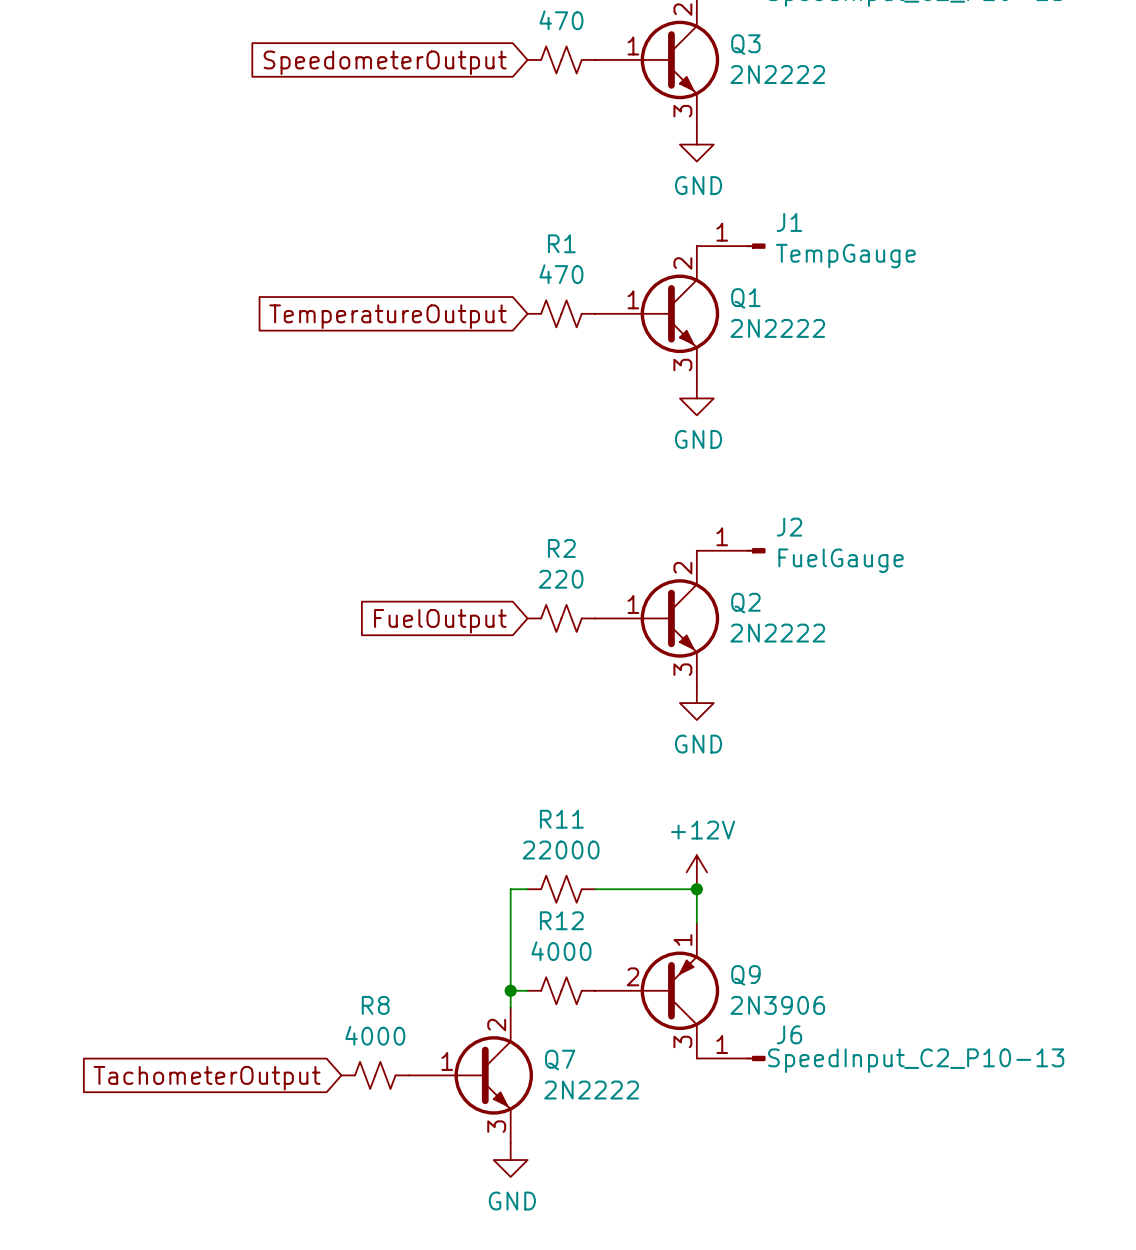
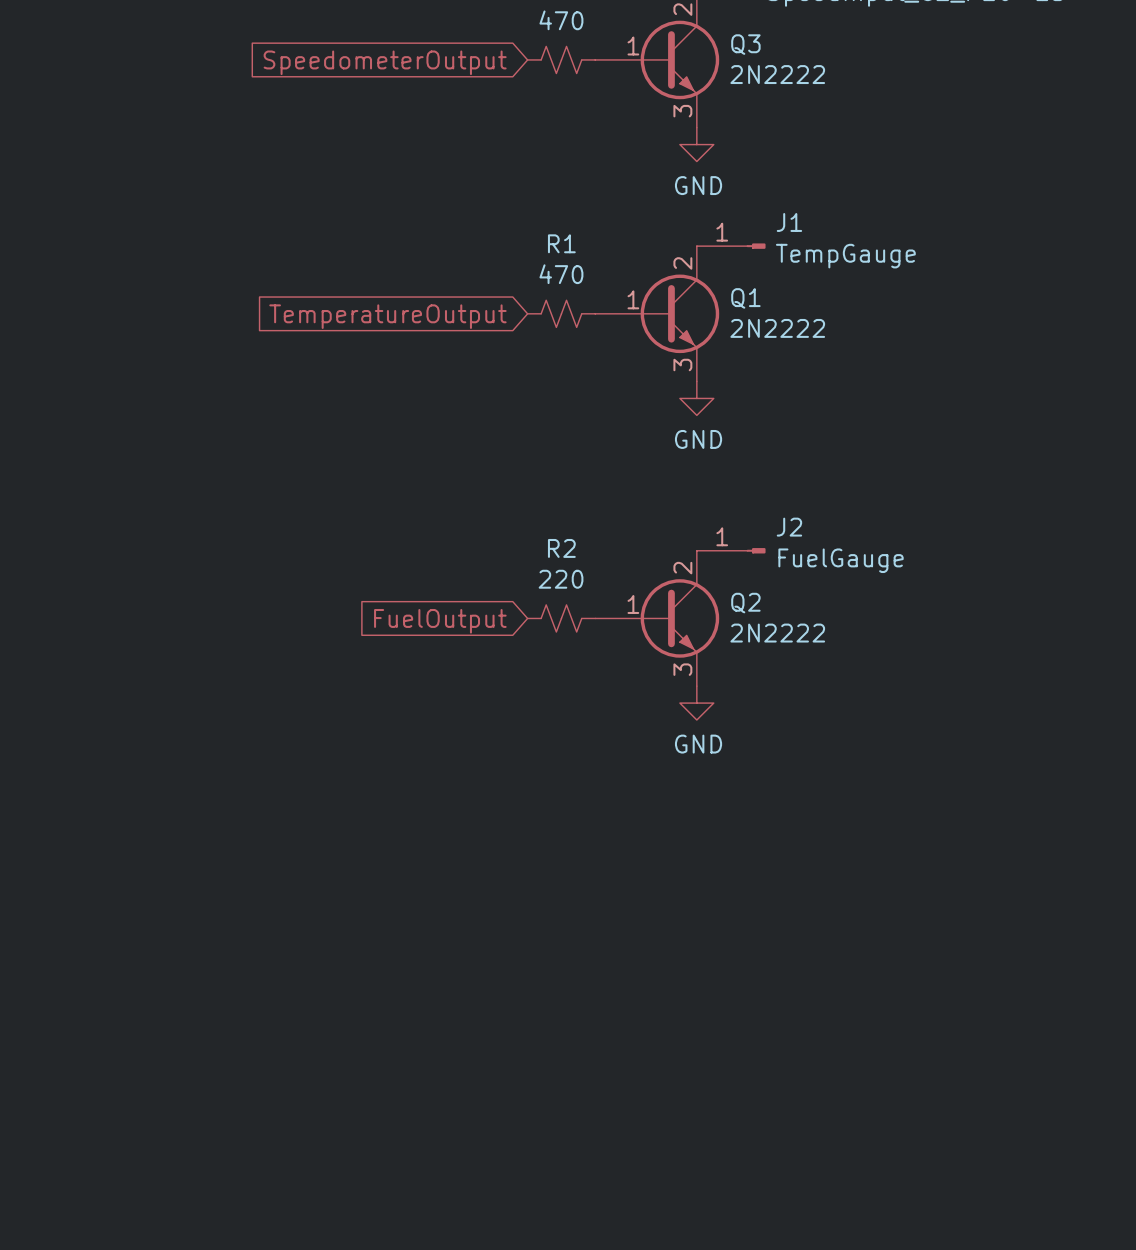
power symbol: +12V (696, 872) -> none
wire: (527, 889) (510, 889) (510, 1007) -> none
R11: 22000 (561, 889) -> none
wire: (595, 889) (696, 889) (696, 923) -> none
junction: (696, 889) -> none
wire: (510, 990) (527, 990) -> none
junction: (510, 990) -> none
R12: 4000 (561, 990) -> none
Q9: 2N3906 (657, 990) -> none
J6: SpeedInput_C2_P10-13 (731, 1058) -> none
R8: 4000 (375, 1075) -> none
Q7: 2N2222 (471, 1075) -> none
global label: TachometerOutput (207, 1078) -> none
power symbol: GND (510, 1160) -> none

